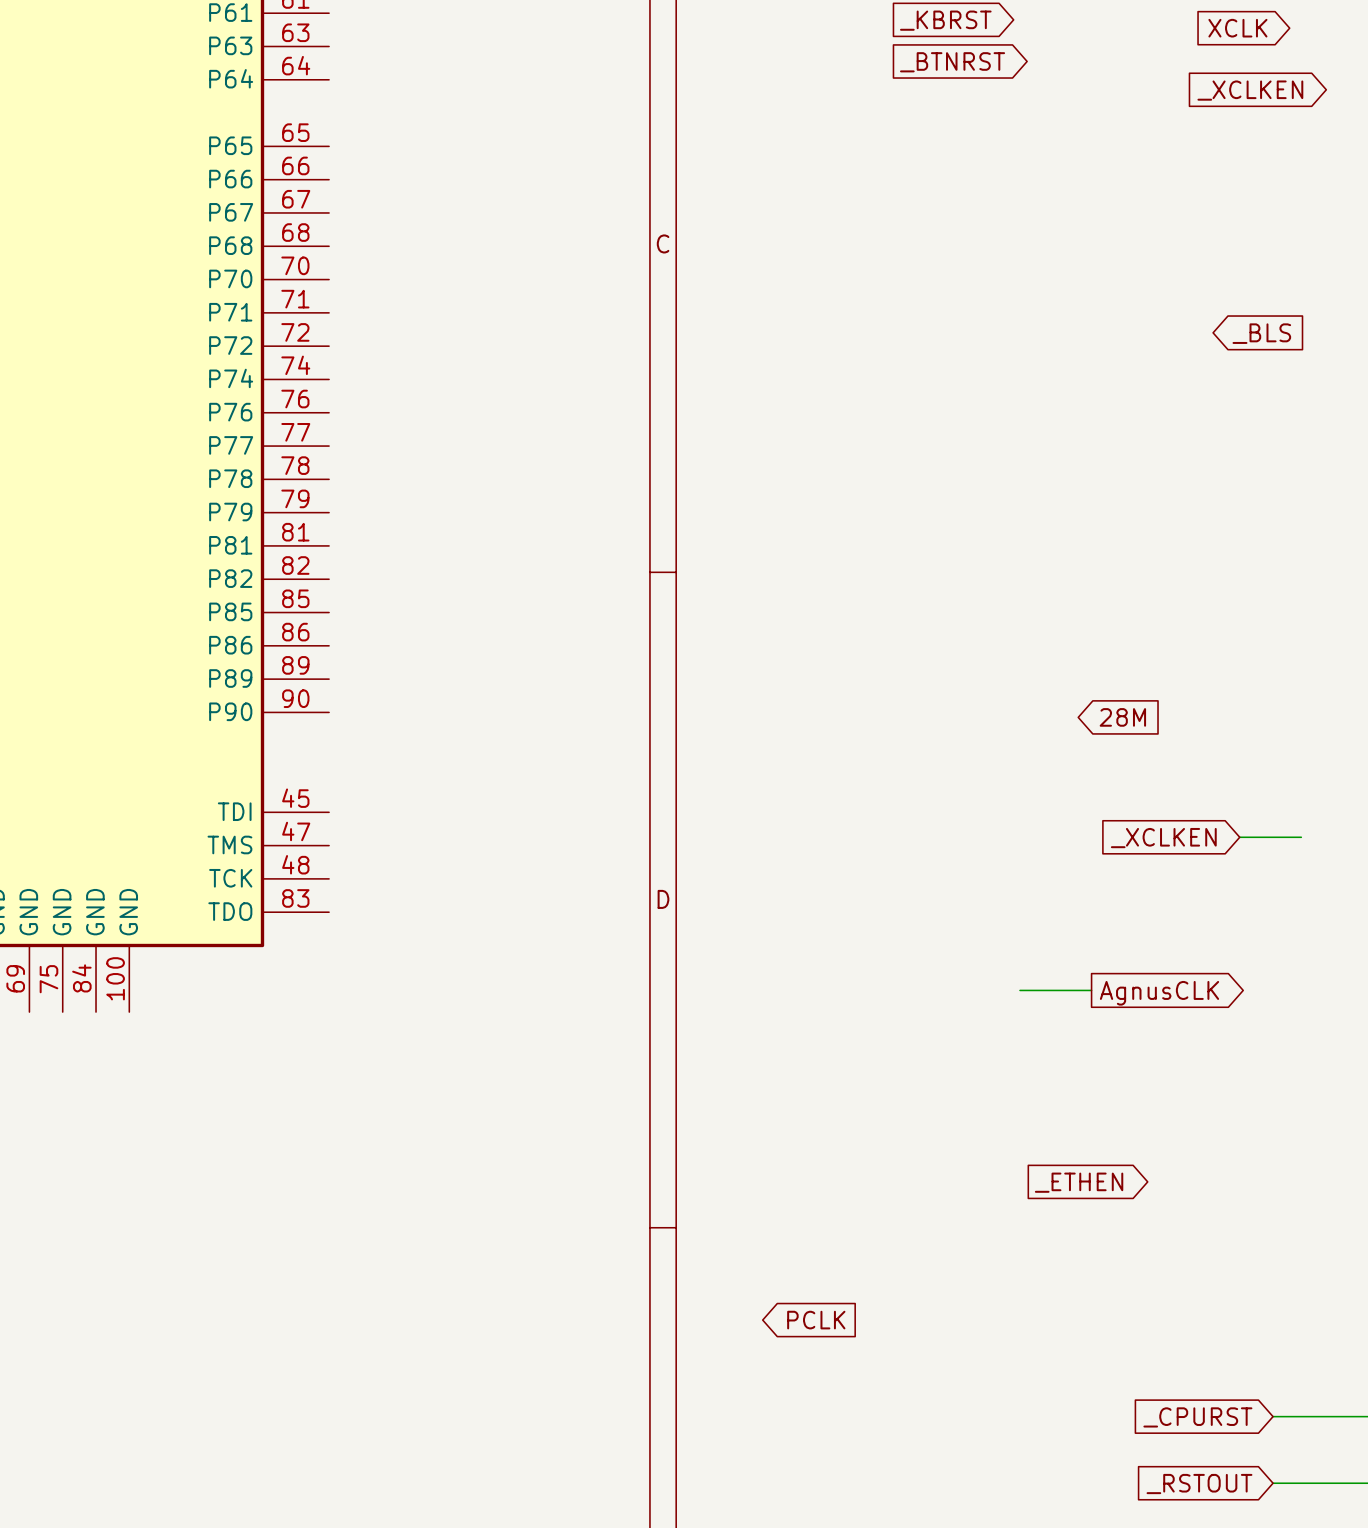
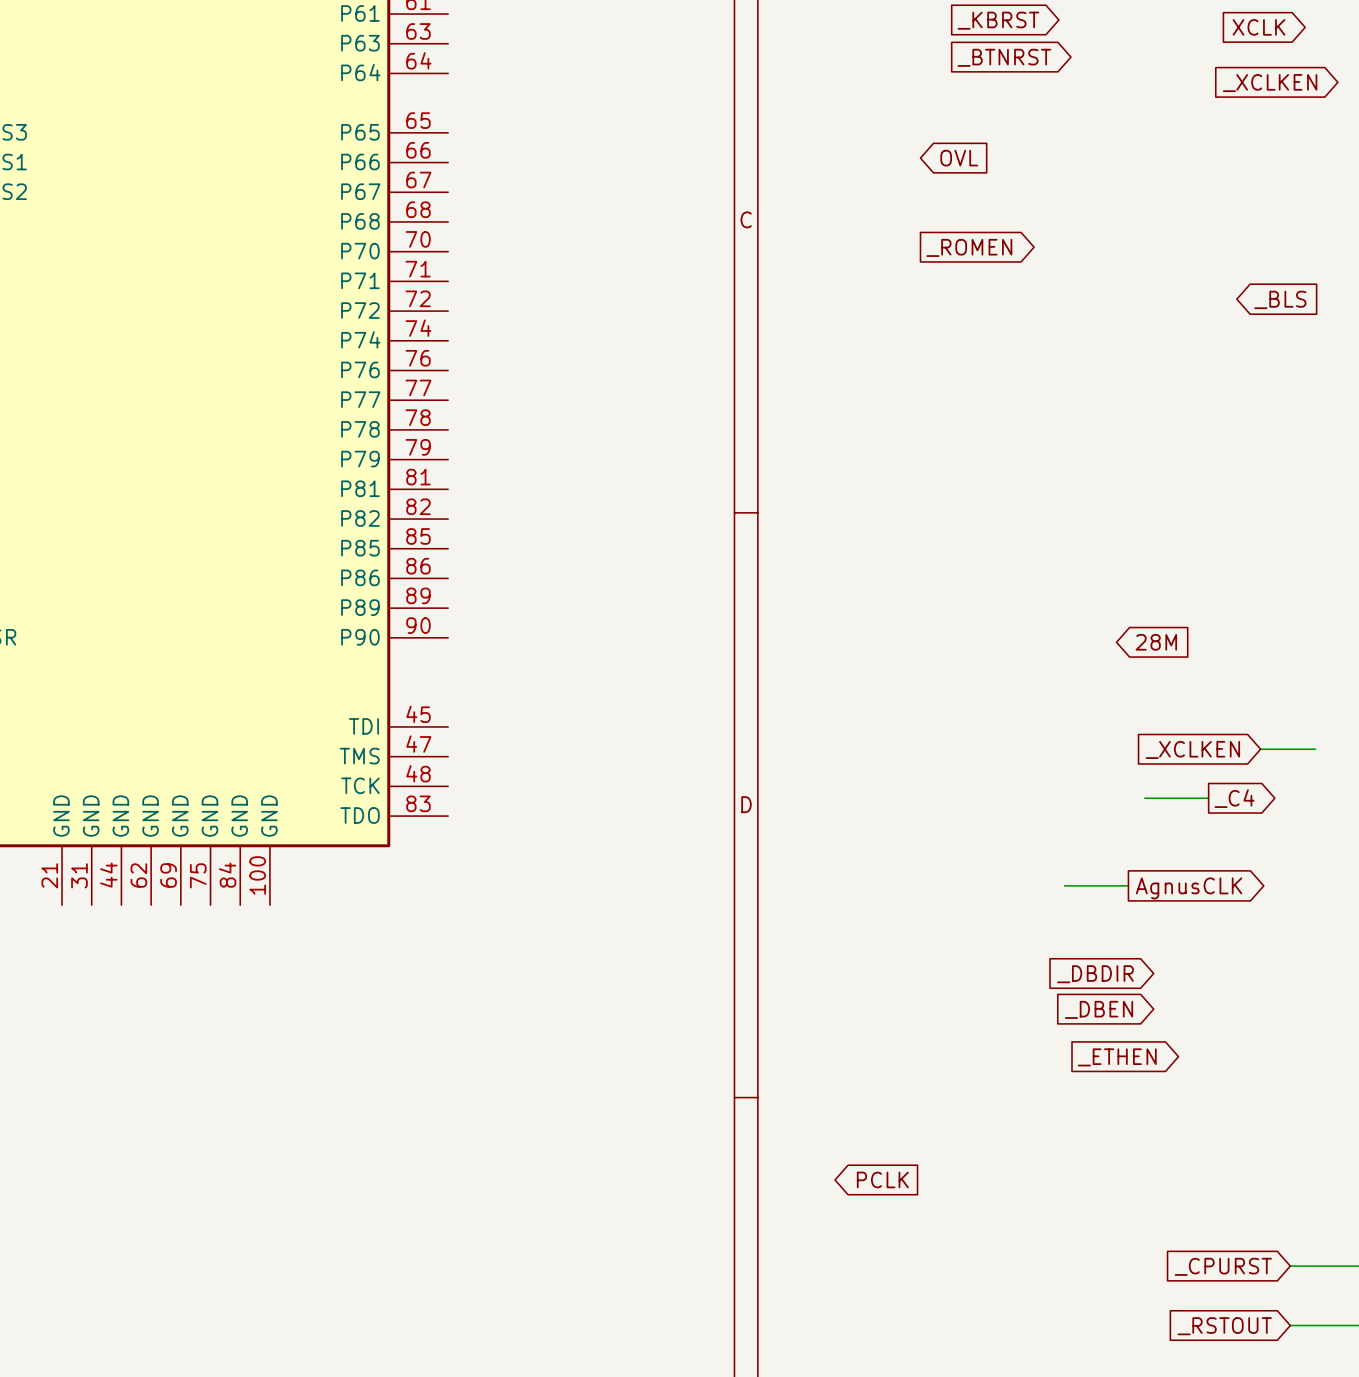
global label: none -> OVL (959, 158)
global label: none -> _ROMEN (969, 247)
wire: none -> (1144, 798) (1208, 798)
global label: none -> _C4 (1234, 798)
global label: none -> _DBDIR (1095, 974)
global label: none -> _DBEN (1099, 1009)

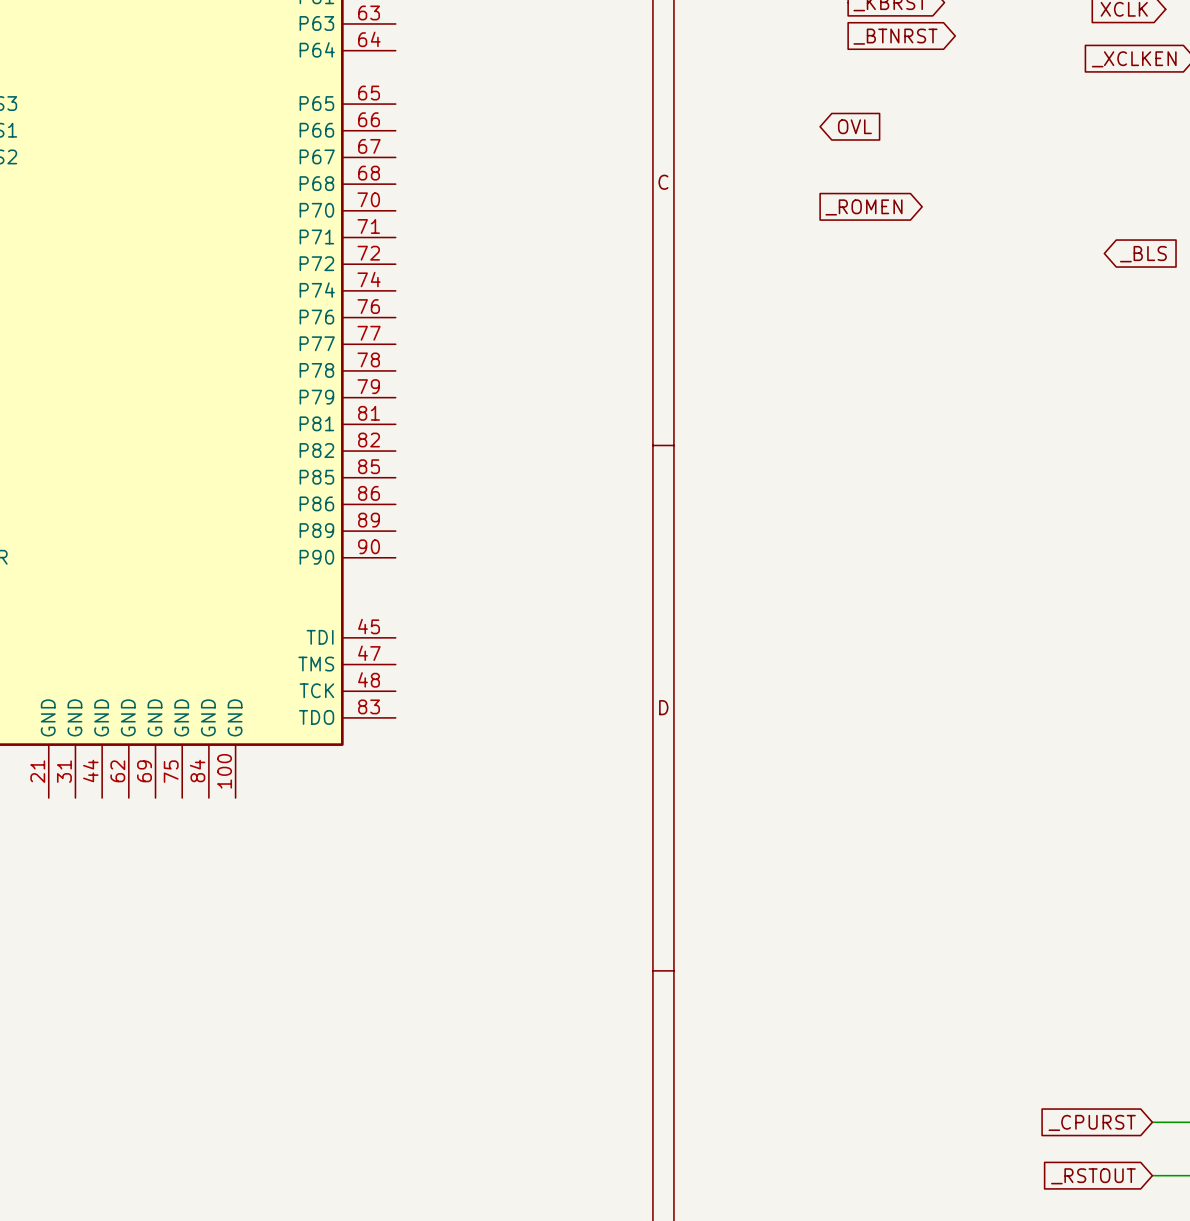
global label: 28M (1156, 642) -> none
global label: _XCLKEN (1192, 749) -> none
wire: (1260, 749) (1315, 749) -> none
wire: (1144, 798) (1208, 798) -> none
global label: _C4 (1234, 798) -> none
wire: (1064, 885) (1128, 885) -> none
global label: AgnusCLK (1189, 888) -> none
global label: _DBDIR (1095, 974) -> none
global label: _DBEN (1099, 1009) -> none
global label: _ETHEN (1117, 1057) -> none
global label: PCLK (882, 1179) -> none

